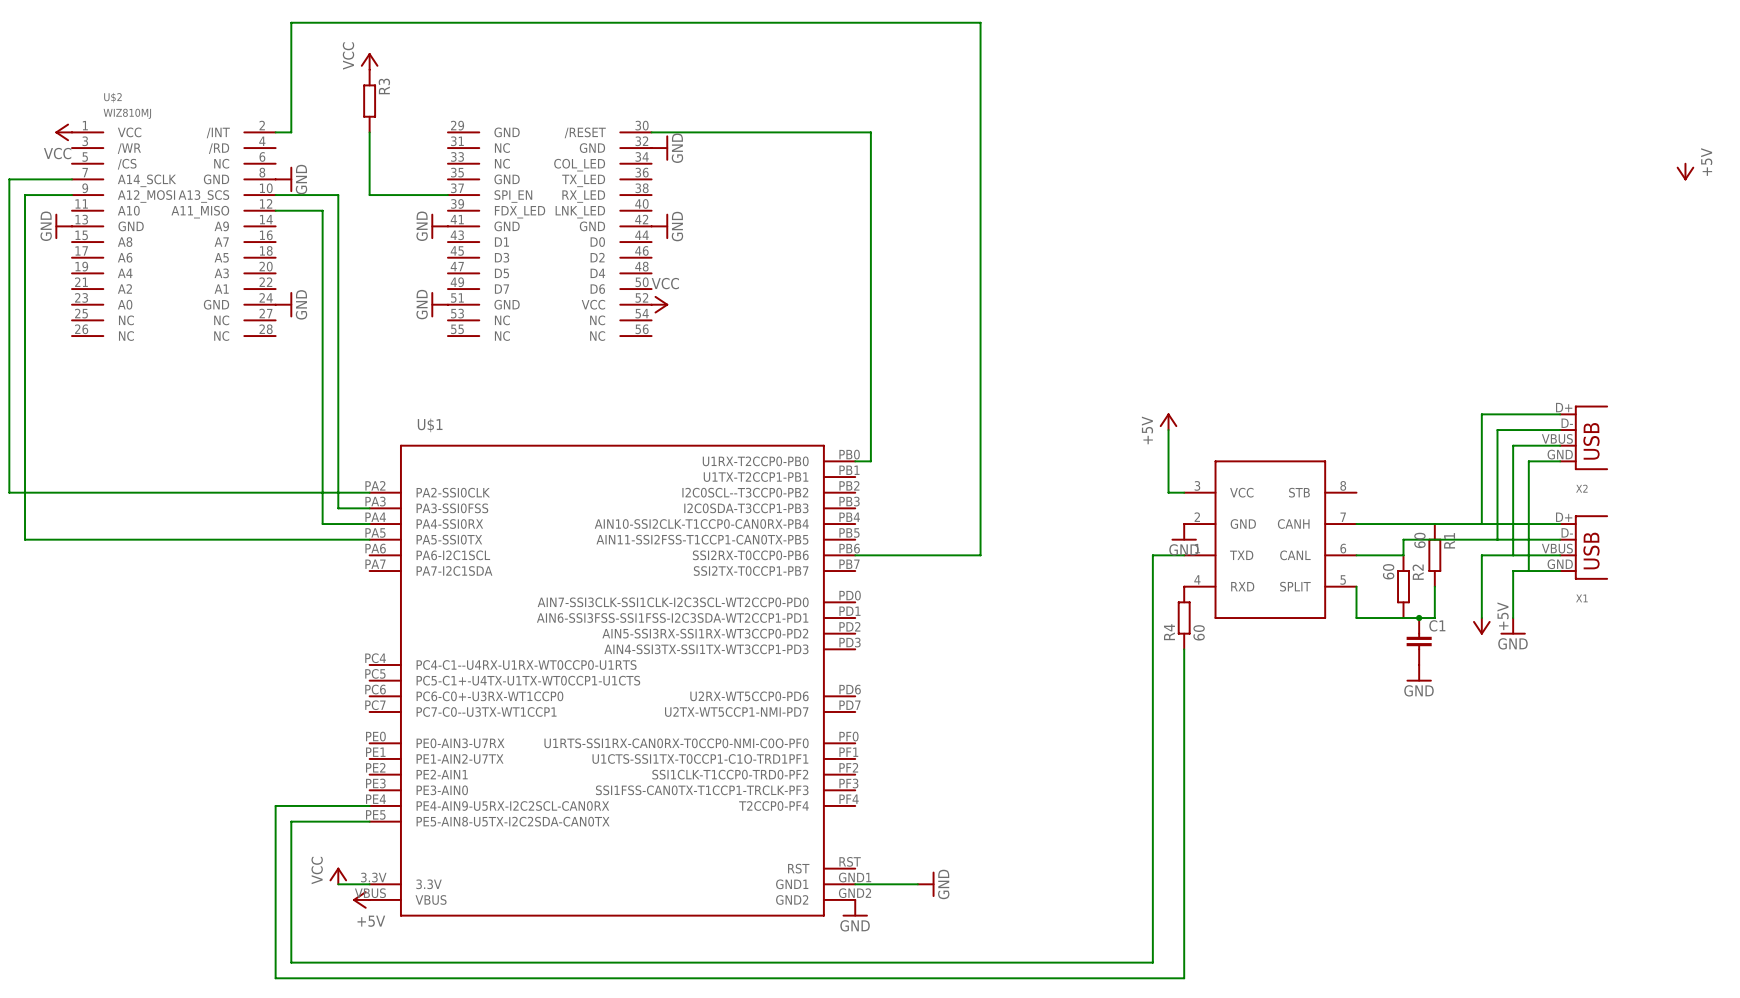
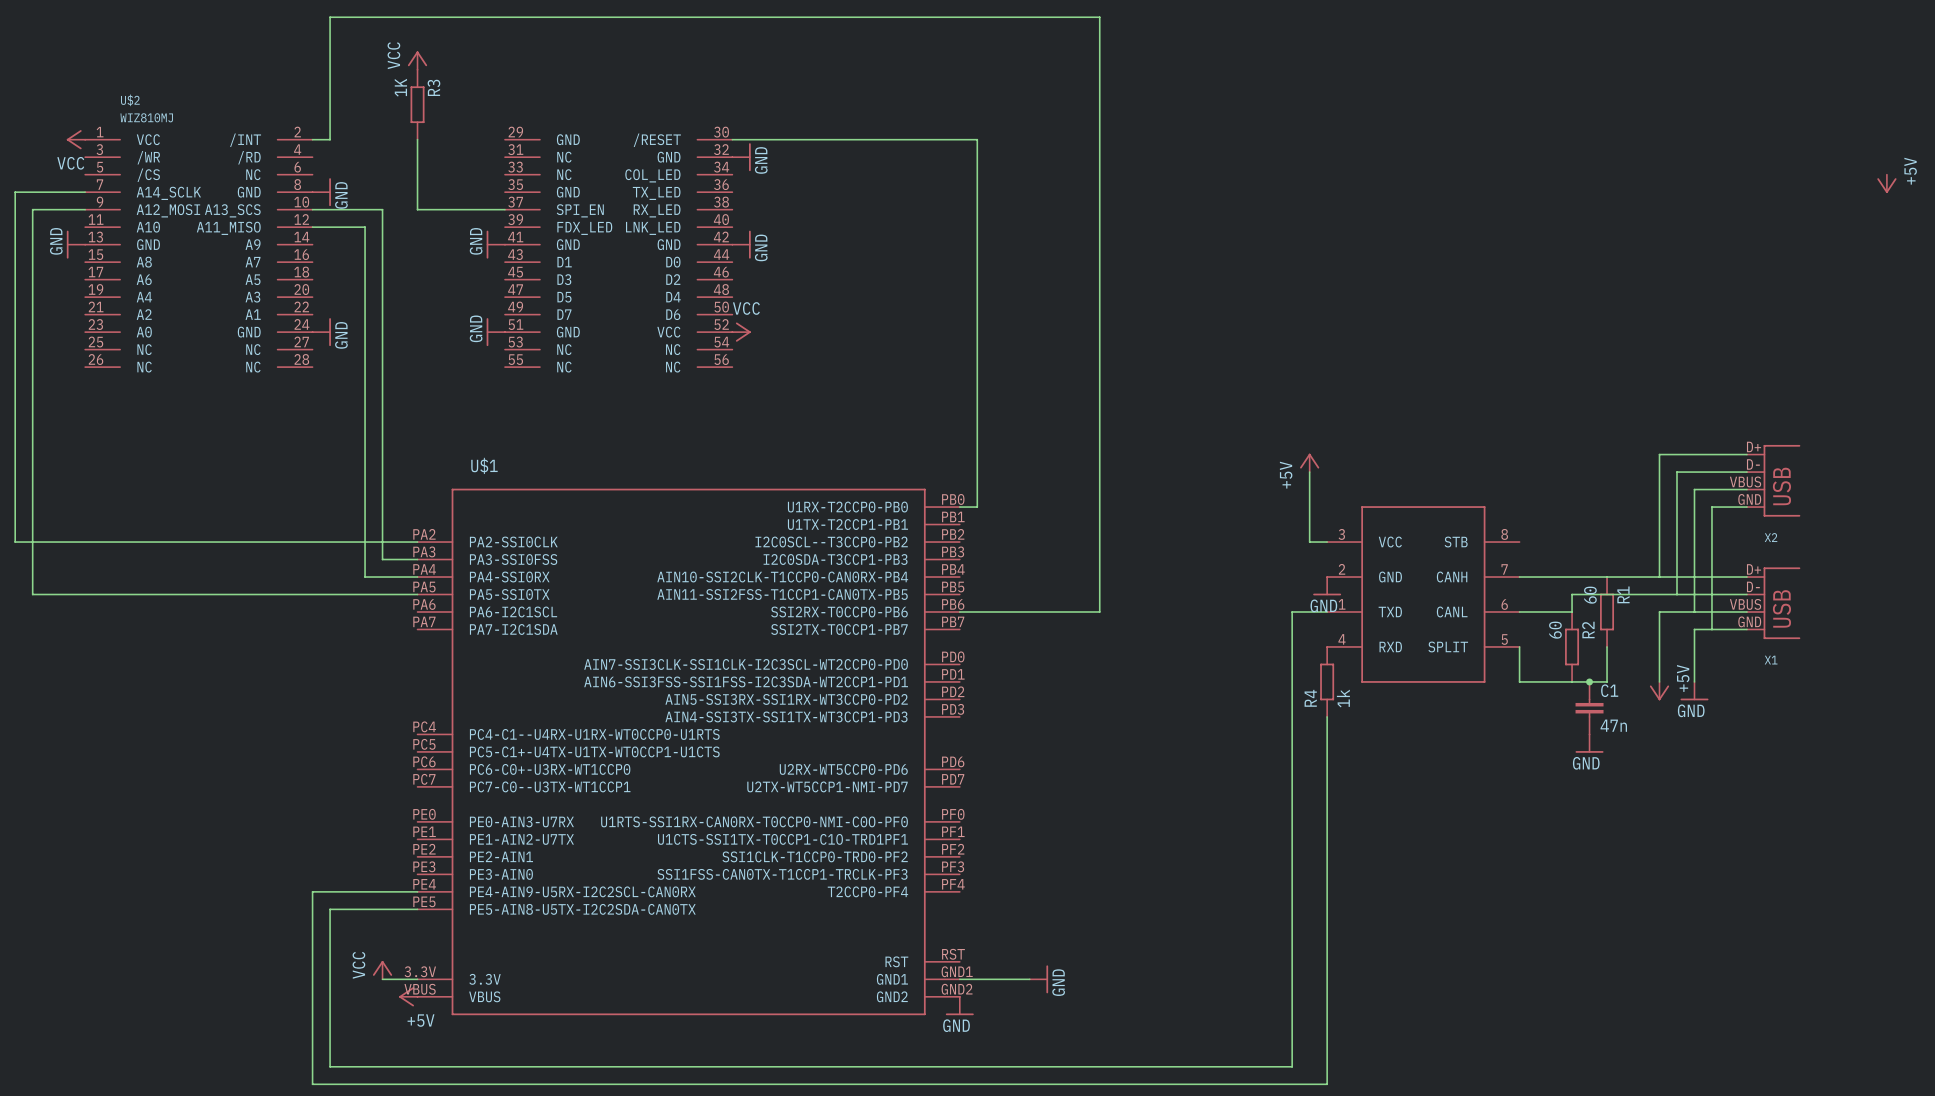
R3 value: none -> 1K (400, 87)
R4 value: 60 (1199, 632) -> 1k (1343, 698)
C1 value: none -> 47n (1613, 725)

